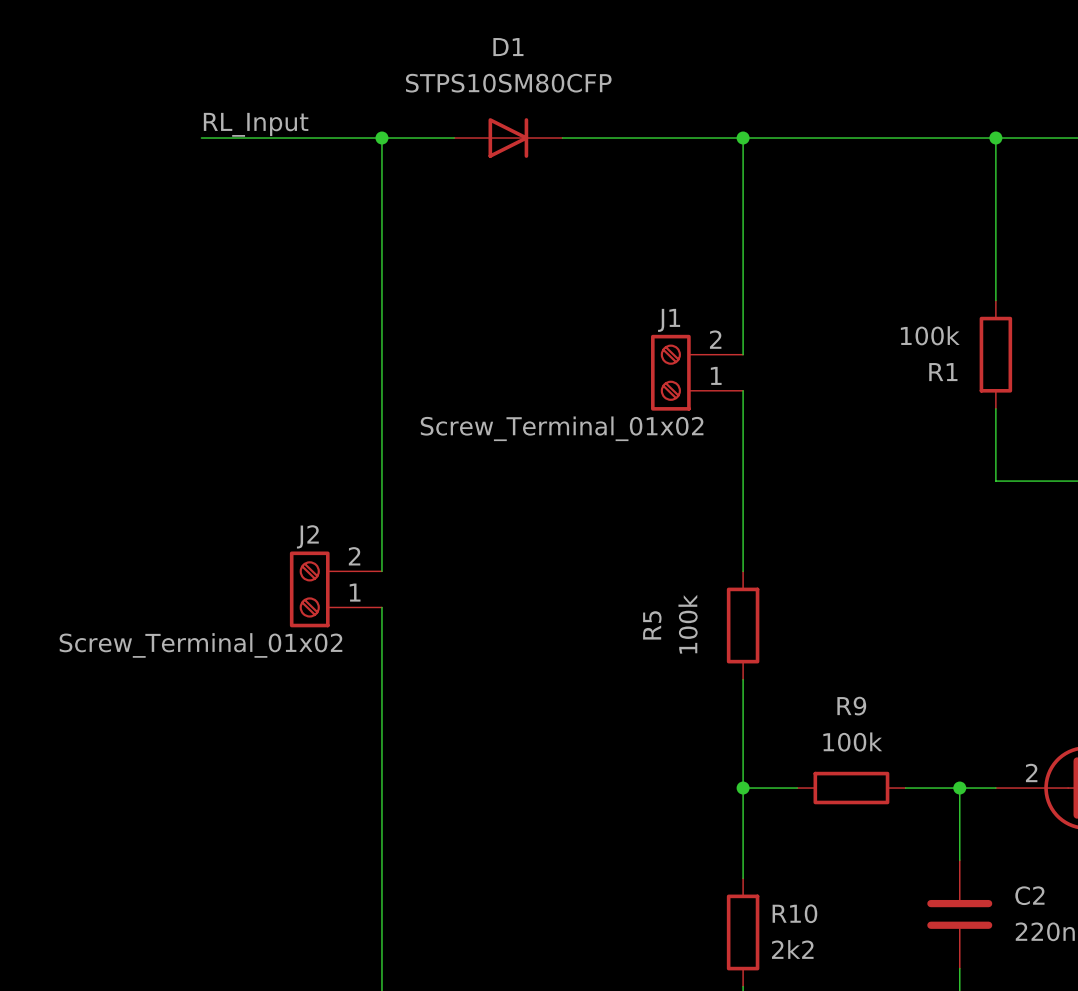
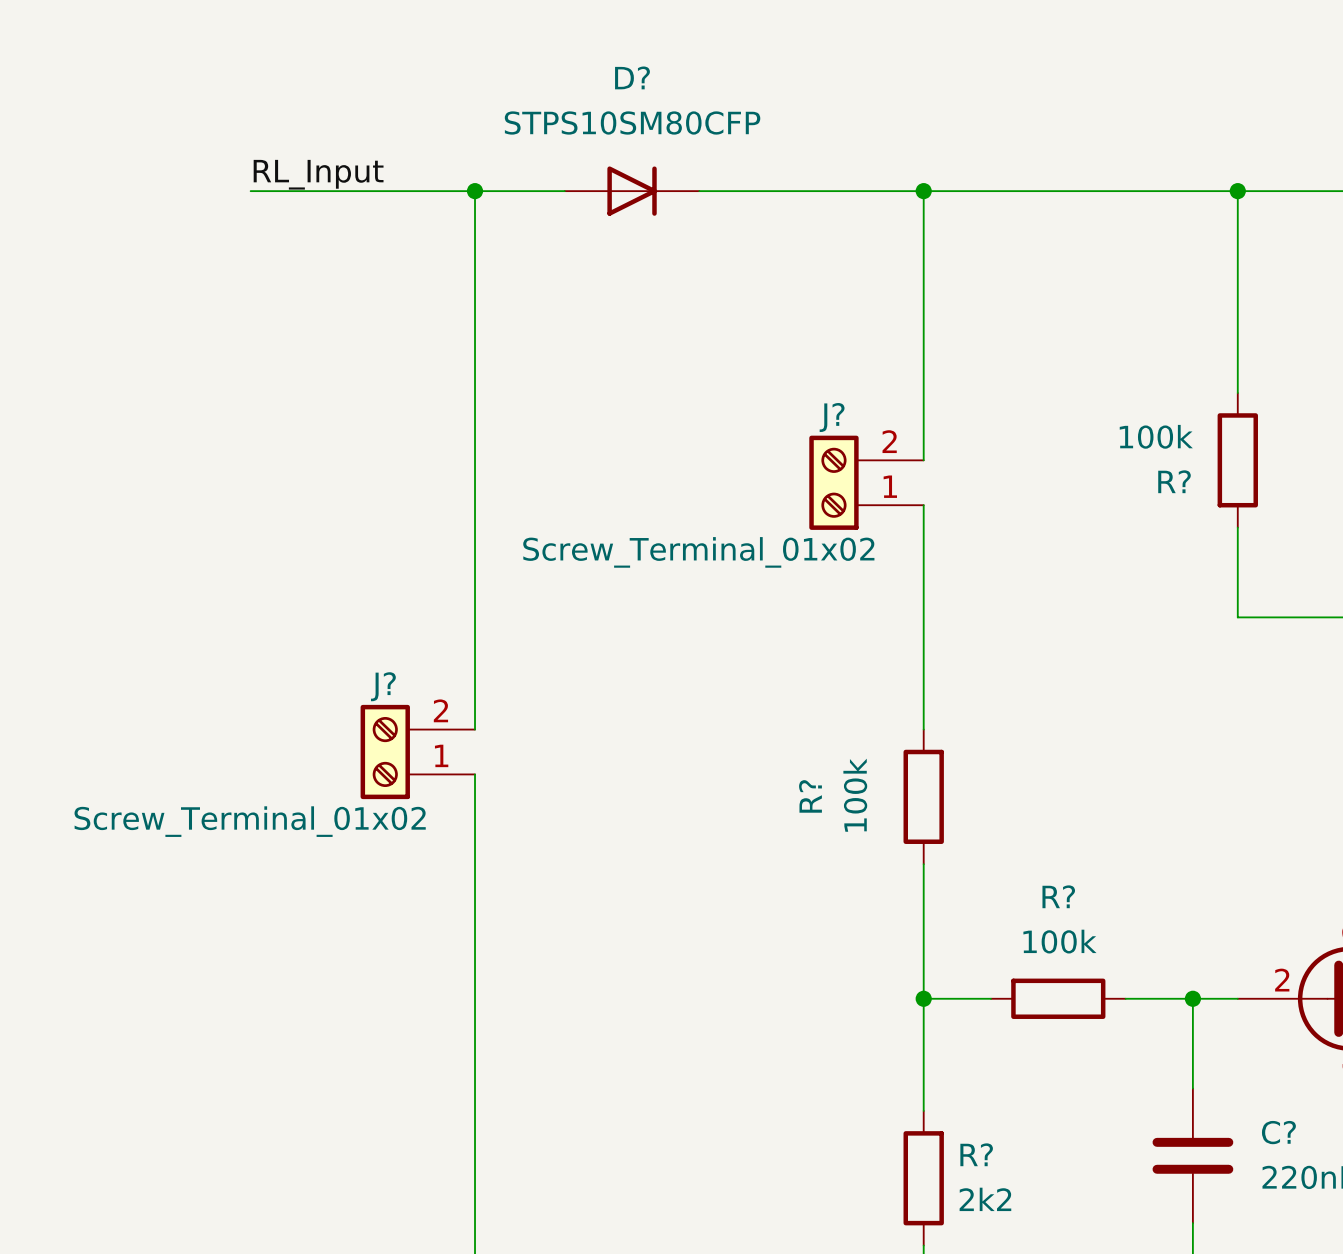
D1 name: D1 (508, 47) -> D? (632, 77)
J1 name: J1 (669, 320) -> J? (832, 417)
R1 name: R1 (943, 372) -> R? (1174, 481)
J2 name: J2 (307, 536) -> J? (383, 686)
R5 name: R5 (652, 625) -> R? (810, 796)
R9 name: R9 (851, 706) -> R? (1058, 896)
C2 name: C2 (1029, 895) -> C? (1278, 1132)
R10 name: R10 (794, 913) -> R? (976, 1154)

